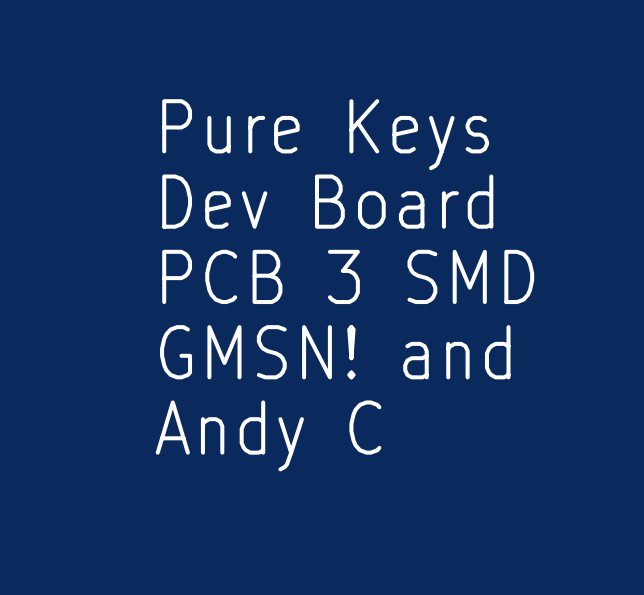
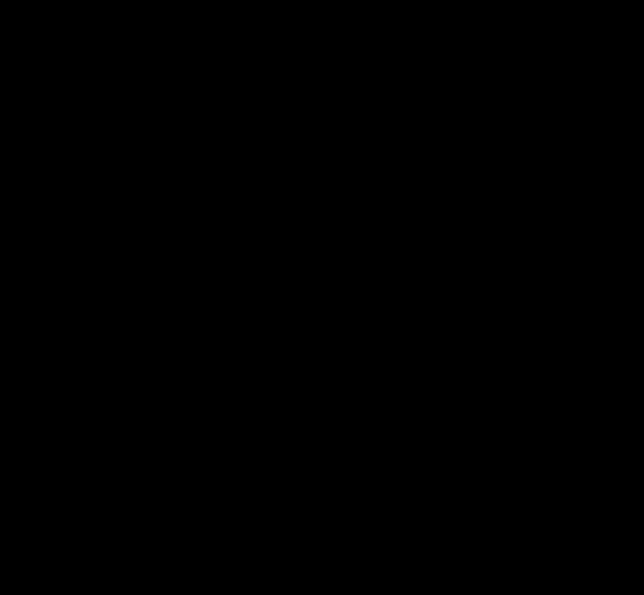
text: Pure Keys (325, 134) -> none
text: Dev Board (327, 201) -> none
text: PCB 3 SMD (348, 276) -> none
text: GMSN! and (335, 352) -> none
text: Andy C (268, 435) -> none

